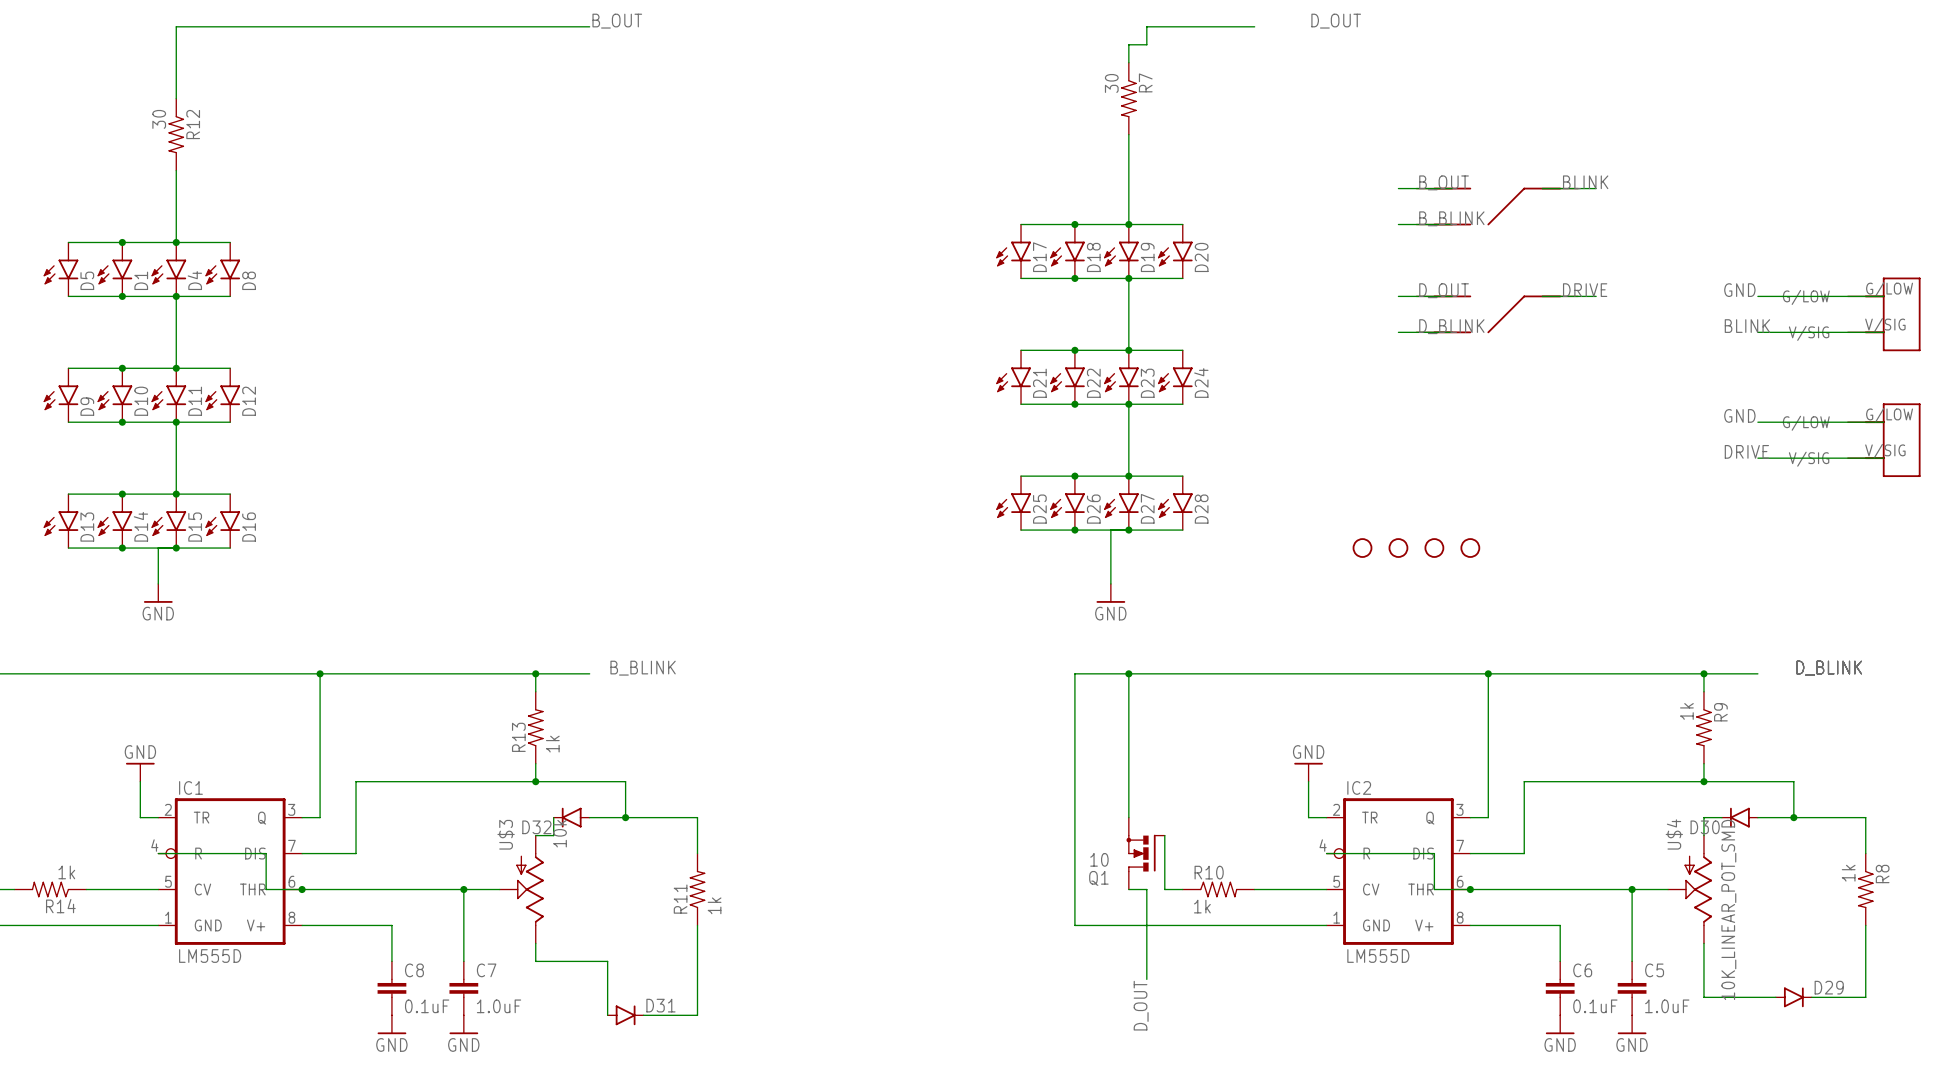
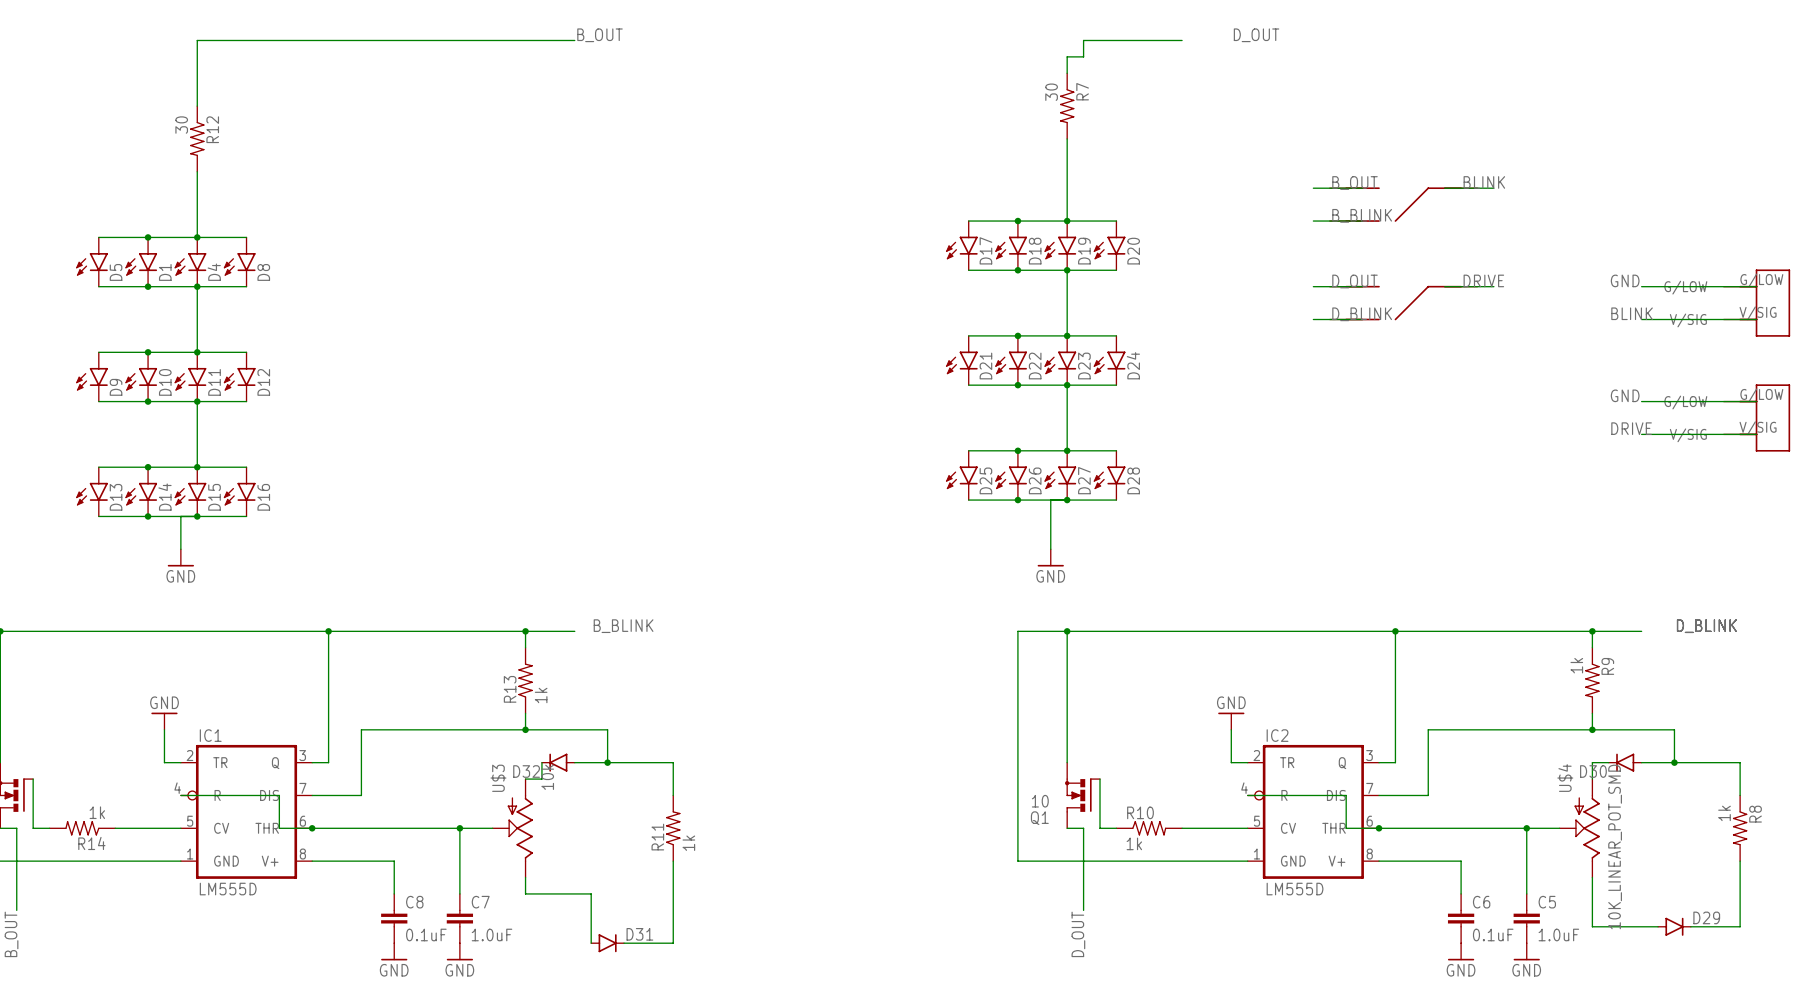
part: (1362, 548) -> none
part: (1398, 548) -> none
part: (1434, 548) -> none
part: (1470, 548) -> none

